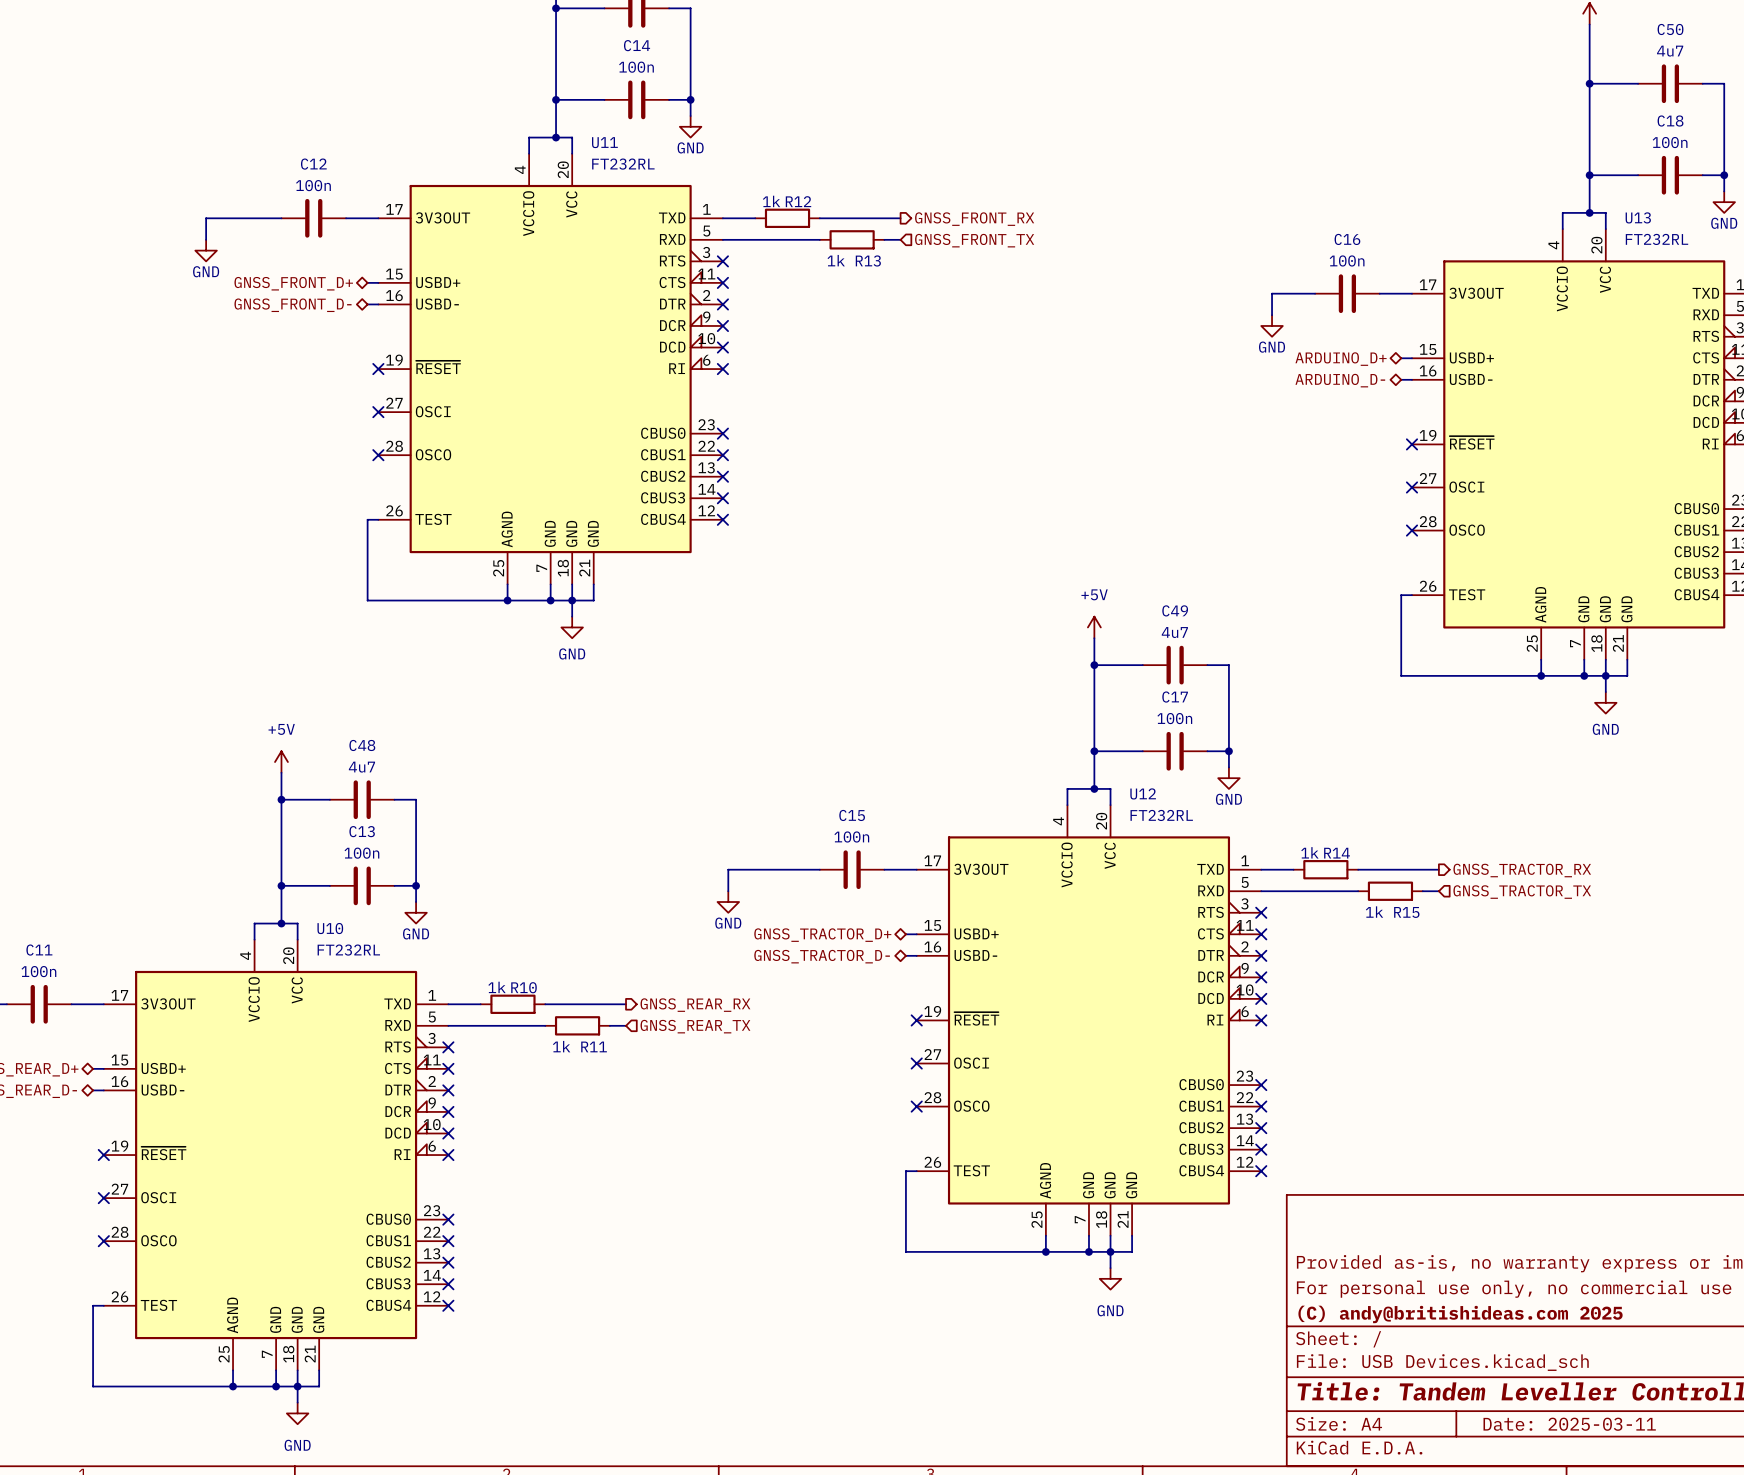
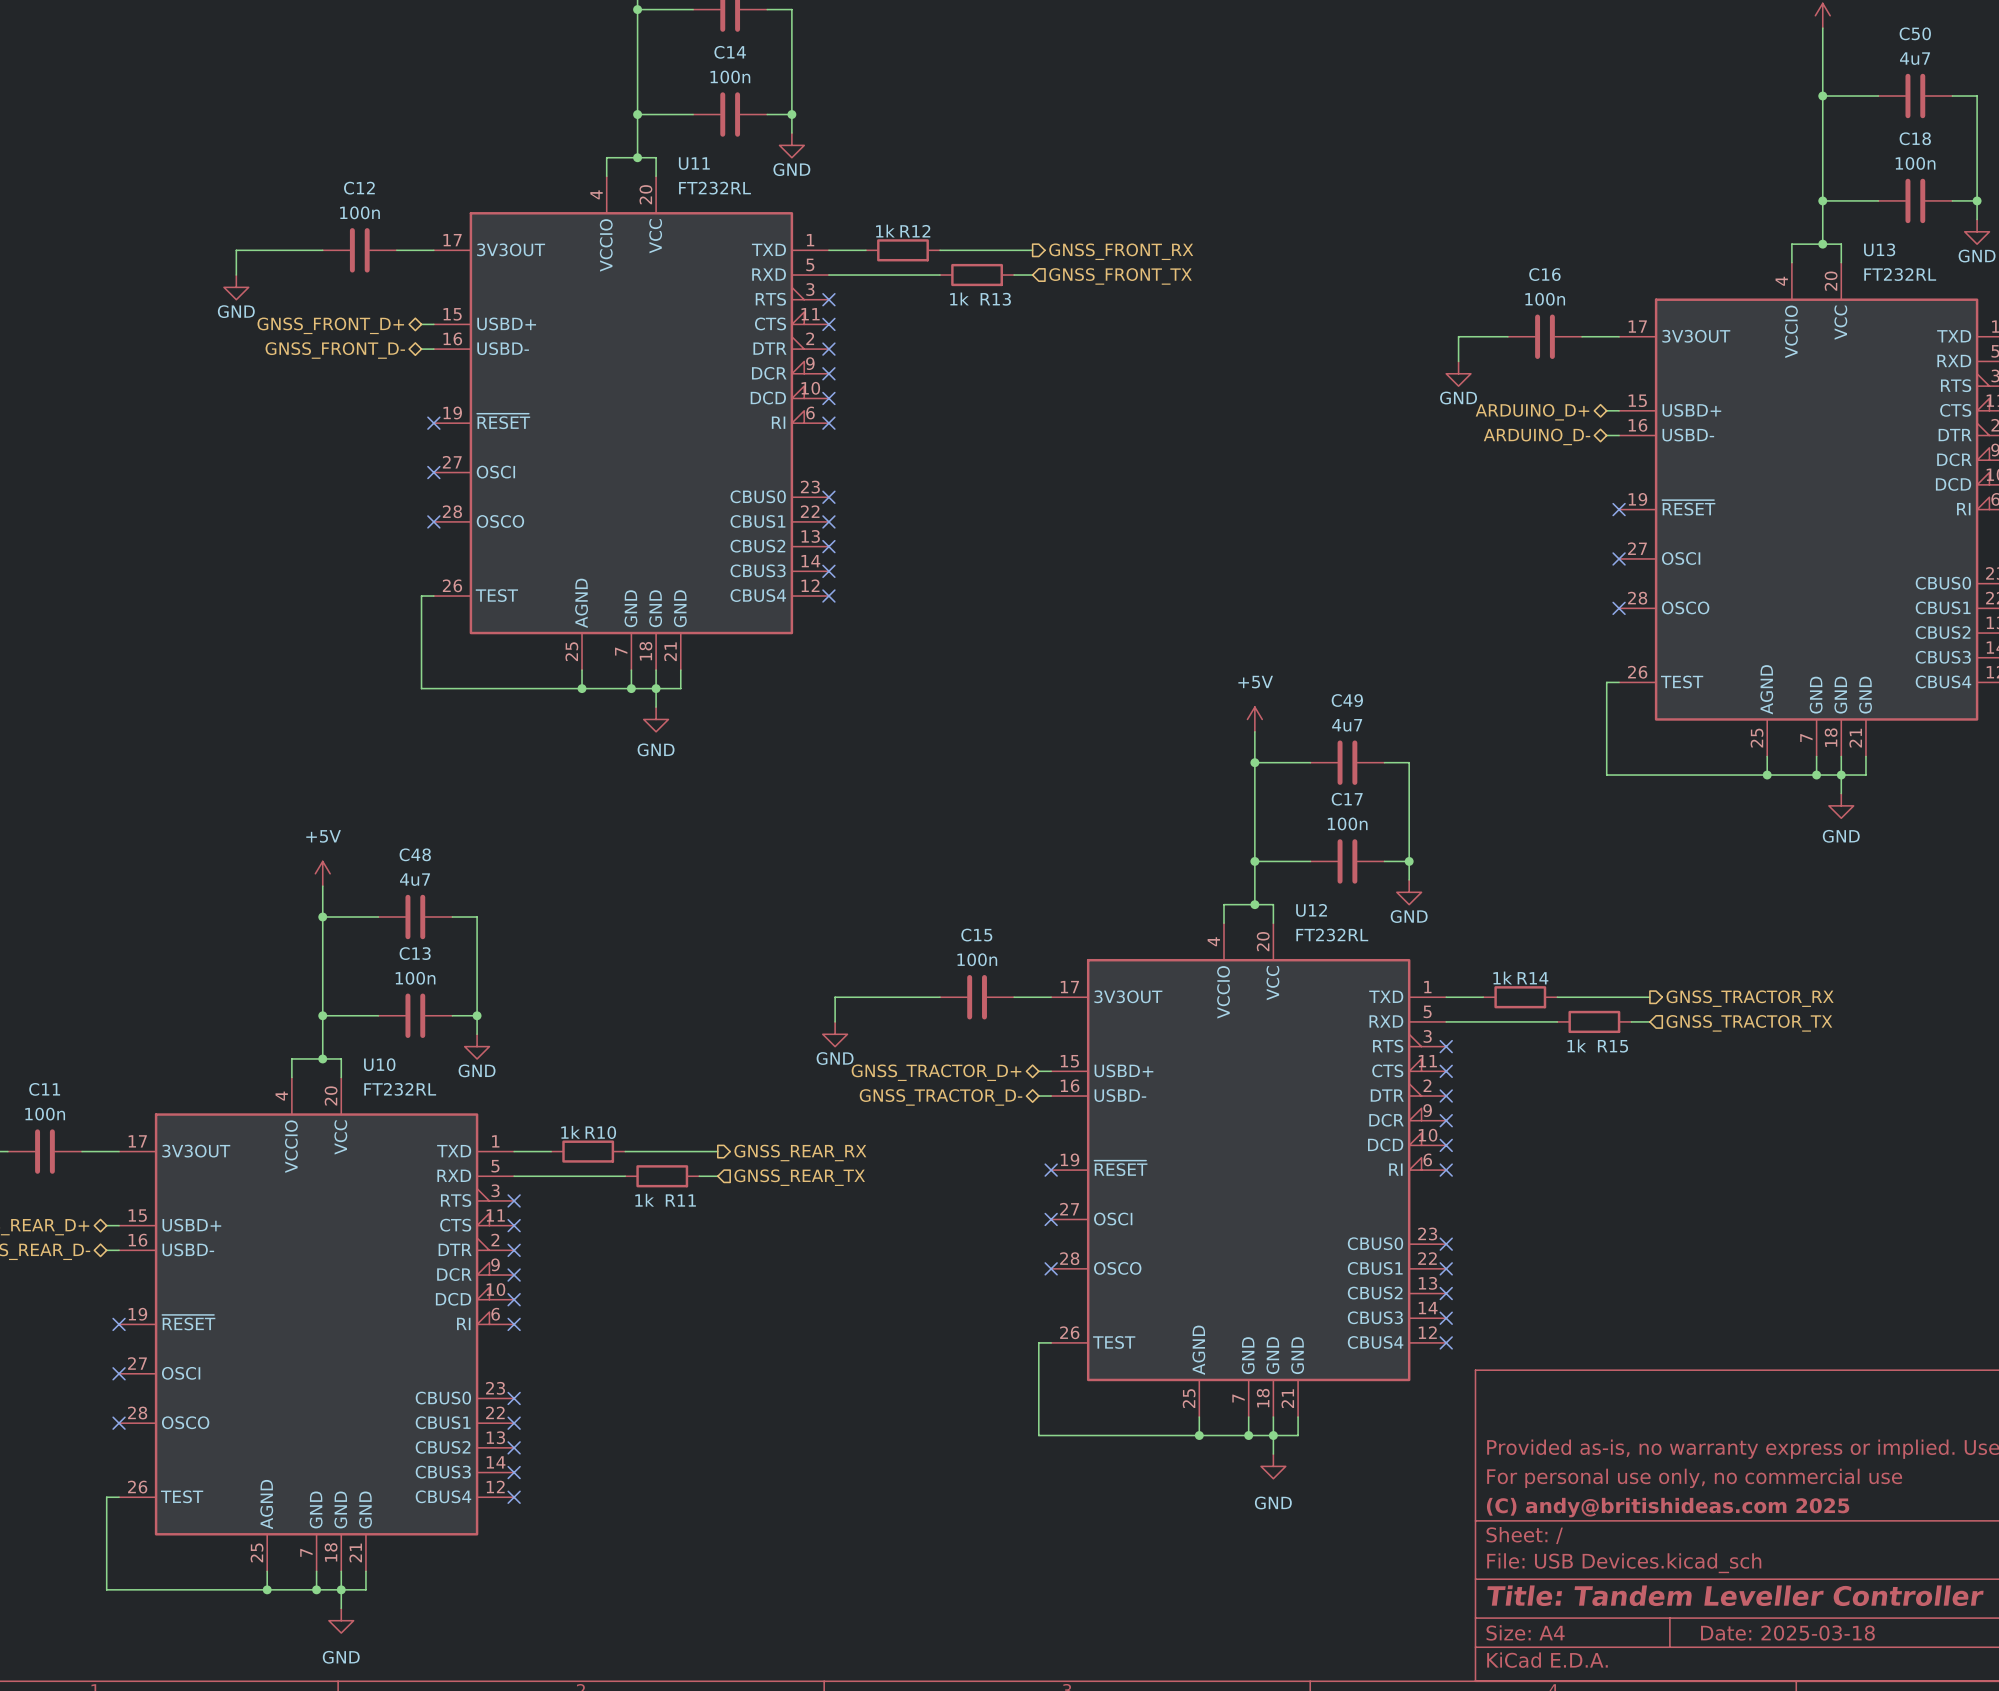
title block: Date: 2025-03-11 (1569, 1424) -> Date: 2025-03-18 (1787, 1633)

